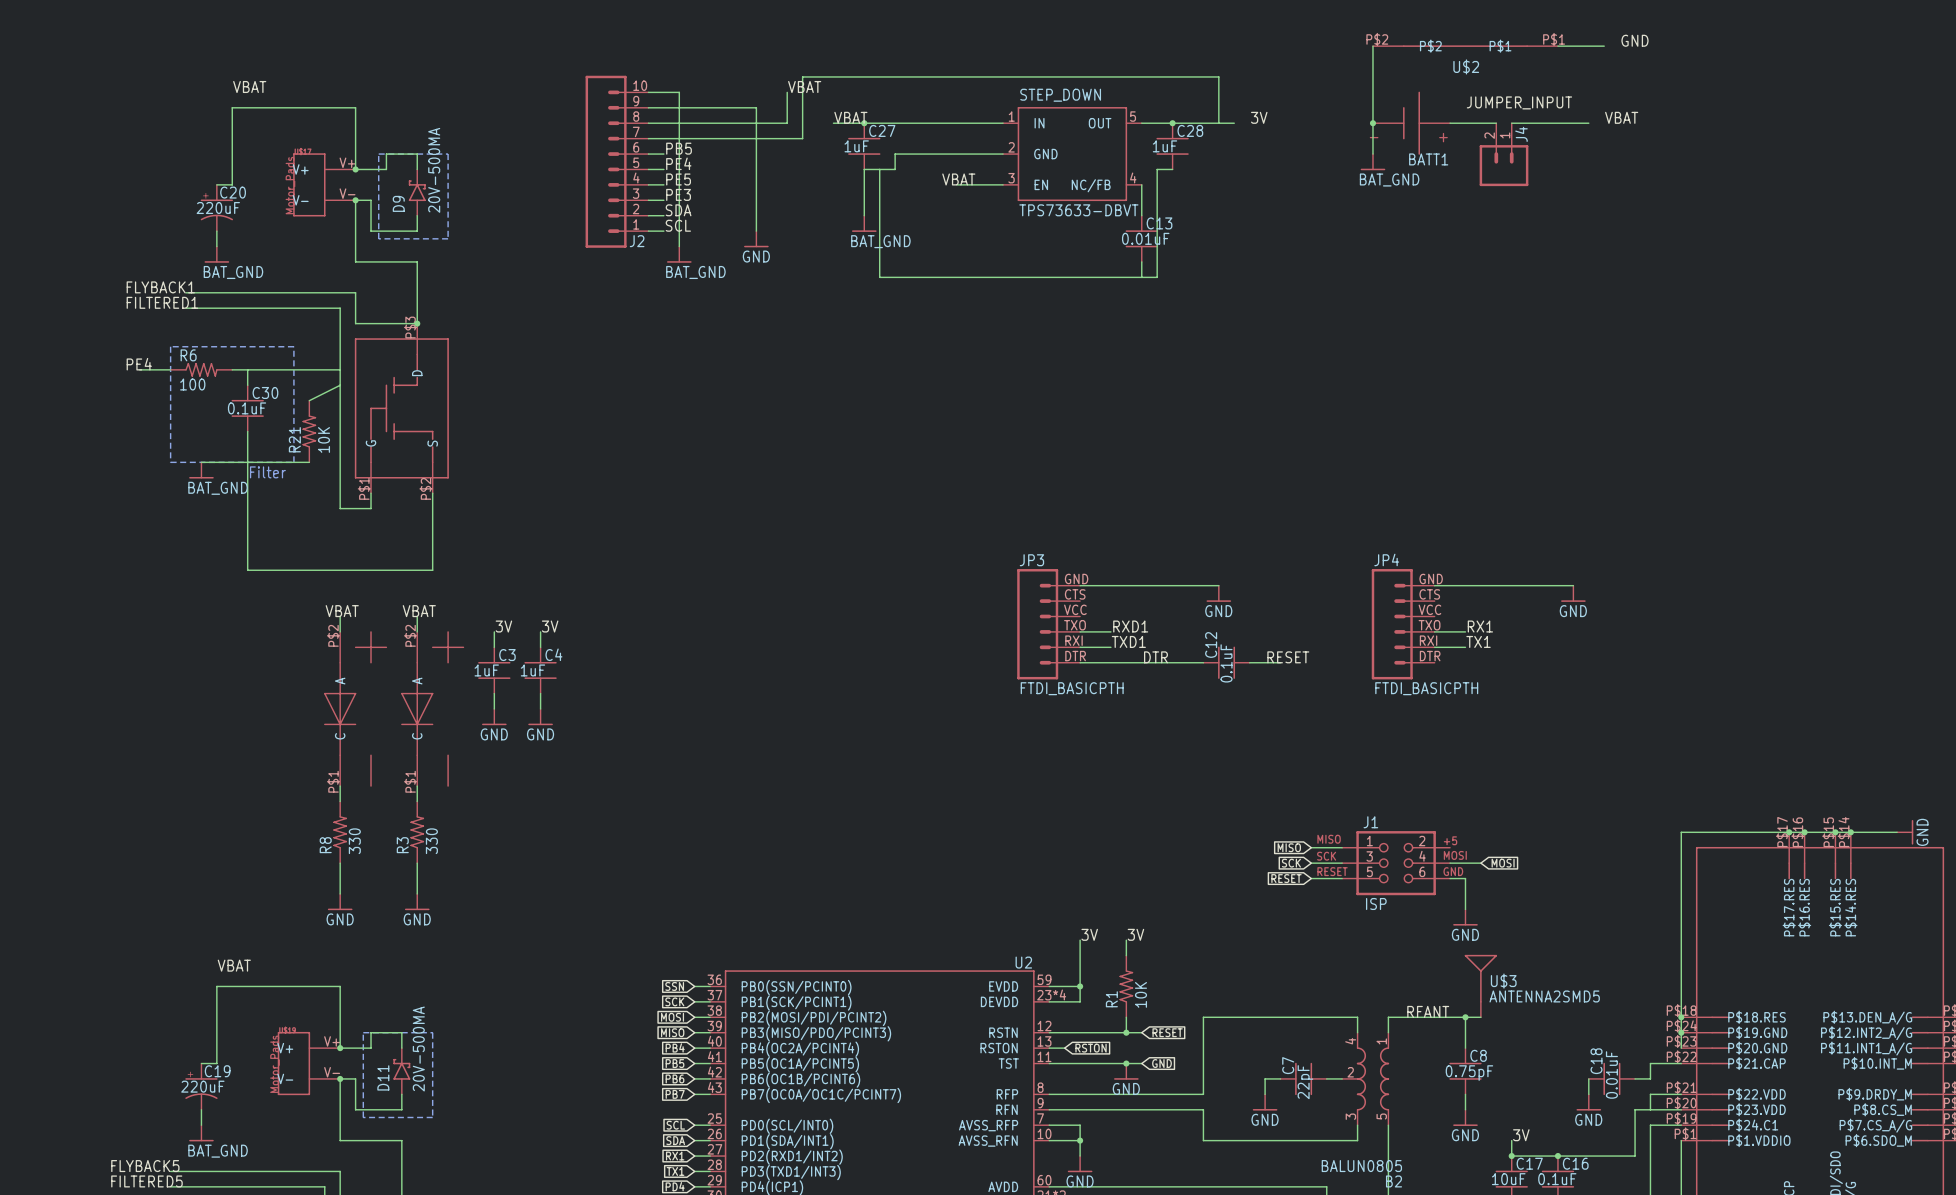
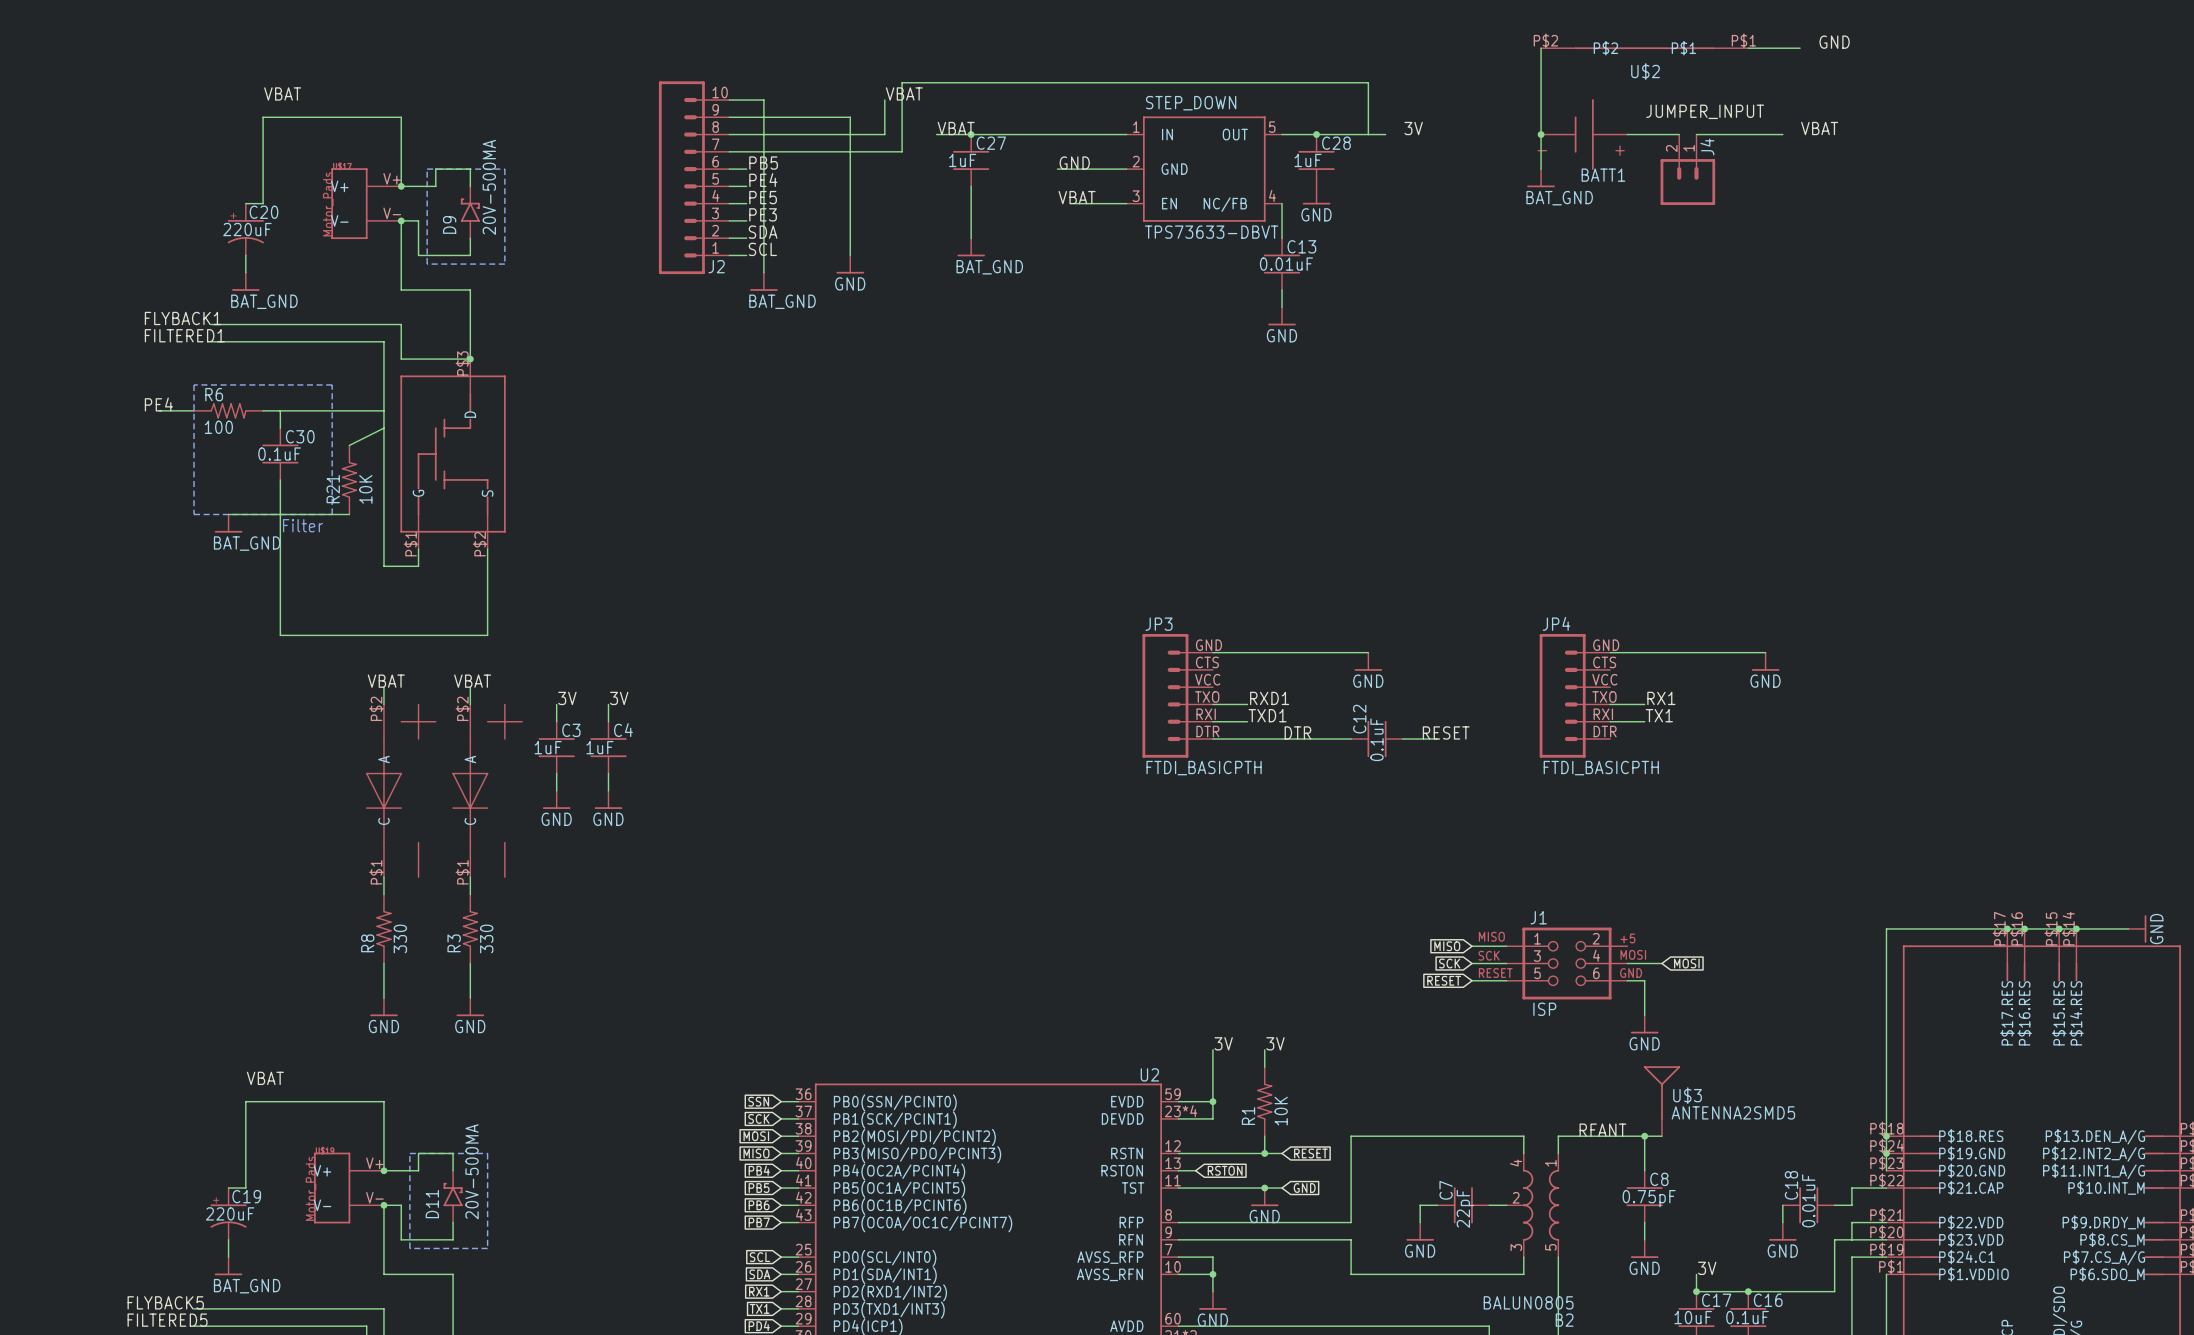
label: none -> GND (1074, 163)
wire: (941, 154) (895, 154) (895, 169) (864, 169) -> none
wire: (879, 169) (879, 277) (1157, 277) (1157, 169) (1172, 169) -> none
power symbol: none -> GND (1316, 195)
power symbol: none -> GND (1282, 316)

